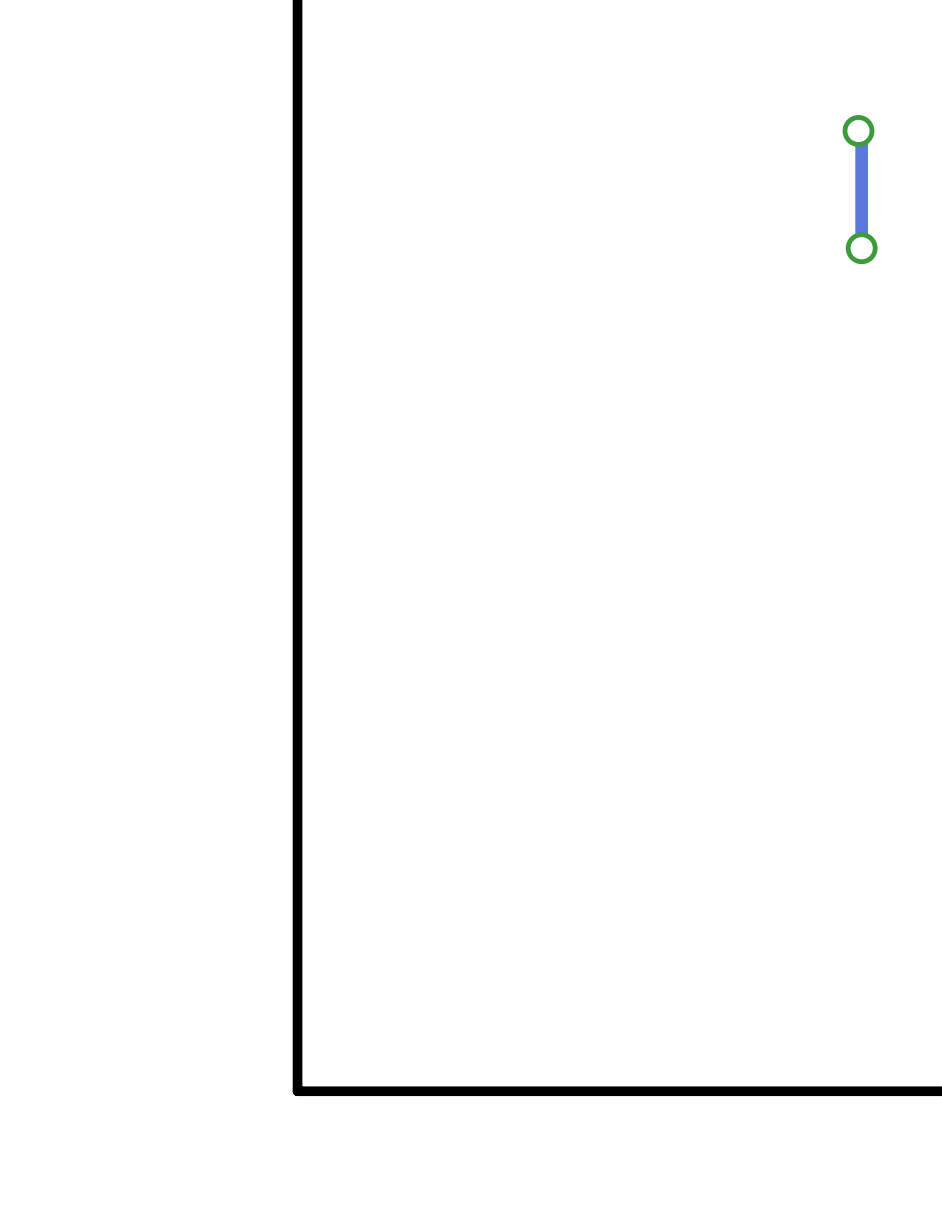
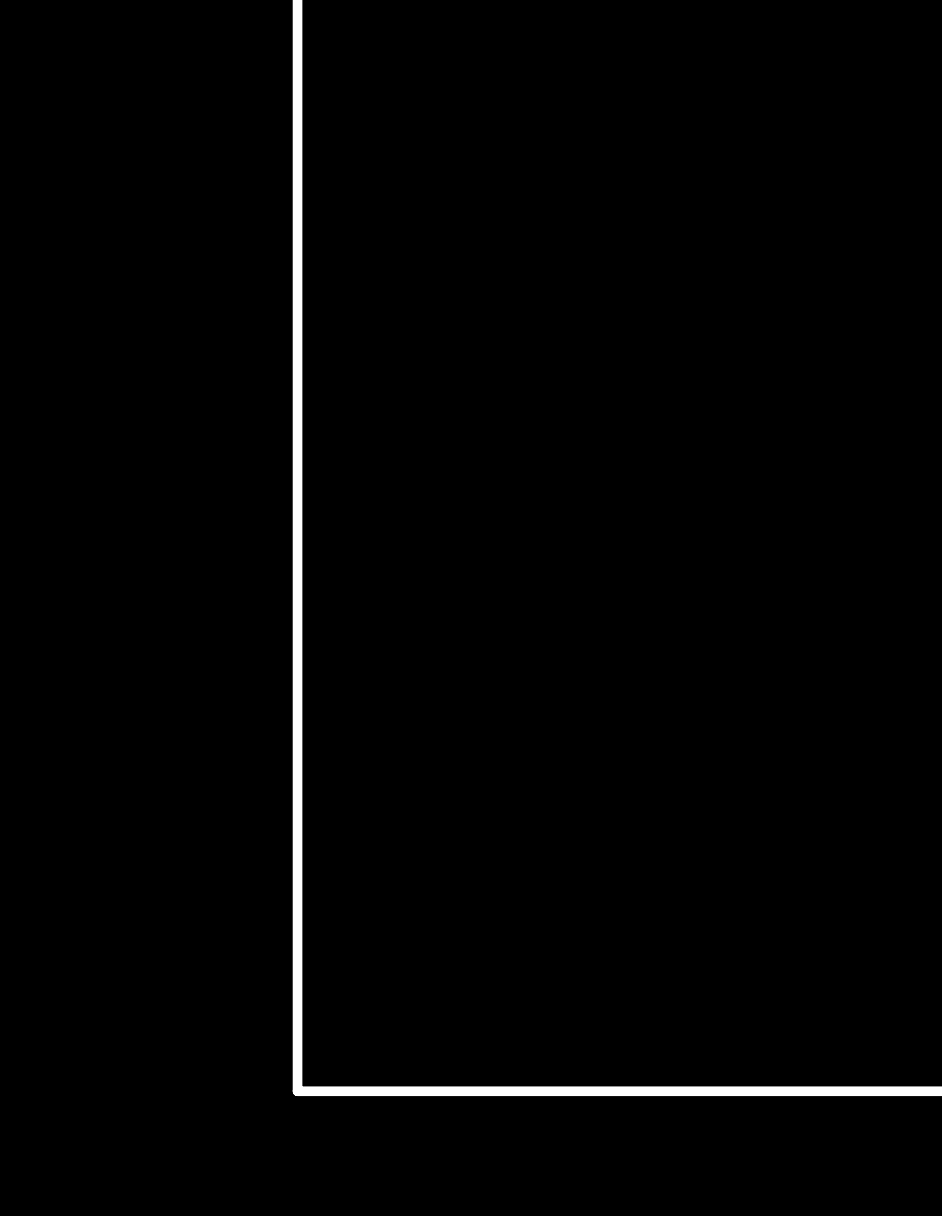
track: (858, 130) (855, 134) (861, 140) (861, 248) -> none
via: (858, 130) -> none
via: (861, 248) -> none

